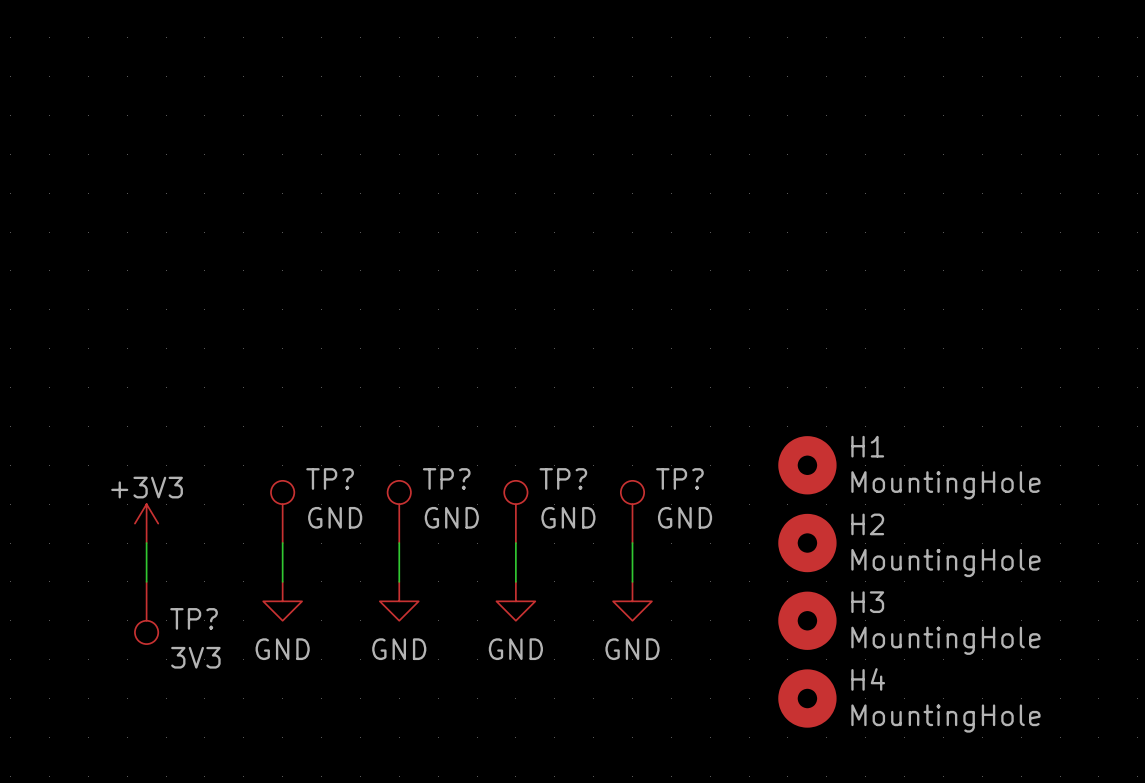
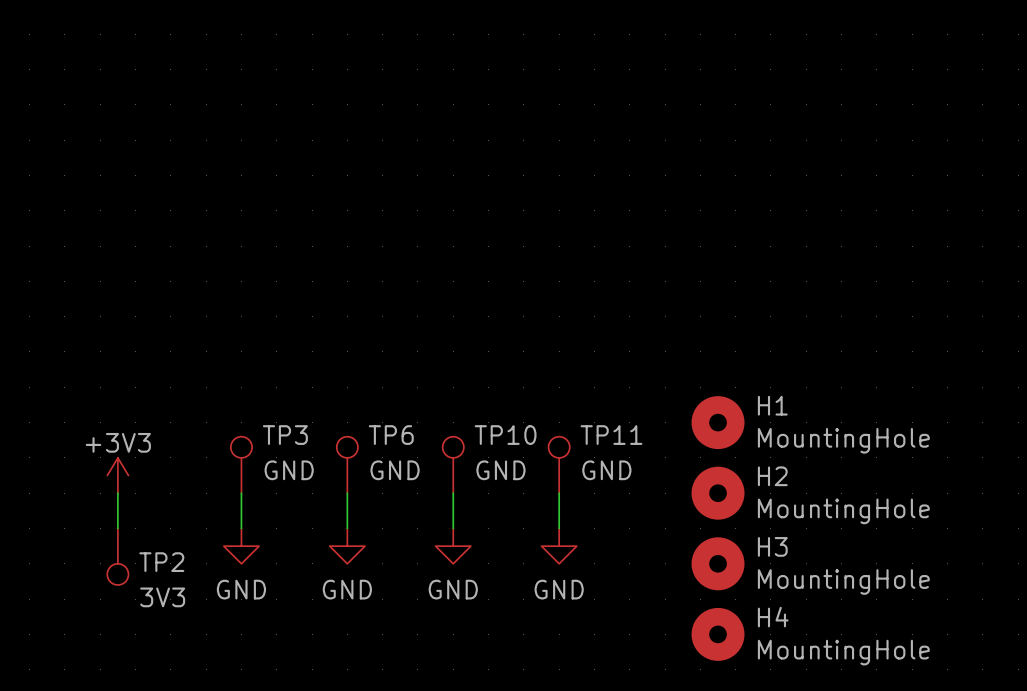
TP? name: TP? (330, 478) -> TP3 (285, 435)
TP? name: TP? (446, 478) -> TP6 (391, 435)
TP? name: TP? (563, 478) -> TP10 (505, 435)
TP? name: TP? (679, 478) -> TP11 (611, 435)
TP? name: TP? (194, 618) -> TP2 (161, 562)

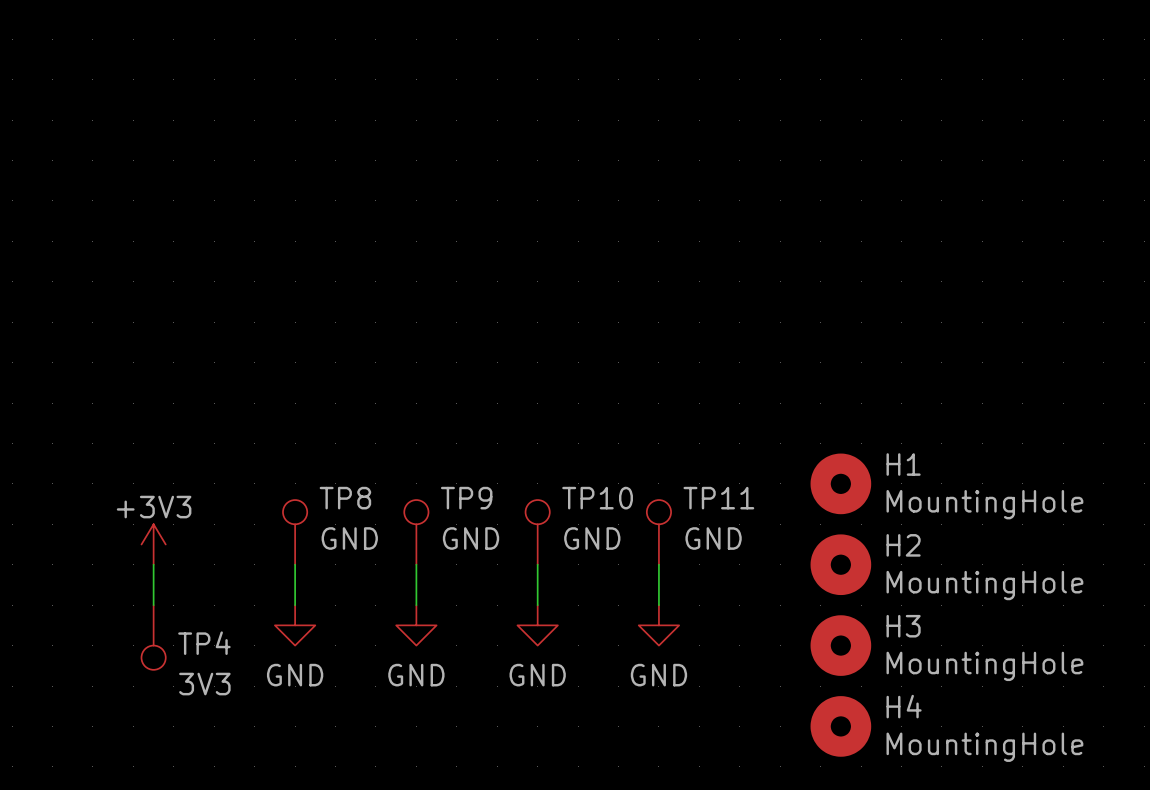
TP3 name: TP3 (285, 435) -> TP8 (345, 498)
TP6 name: TP6 (391, 435) -> TP9 (466, 498)
TP2 name: TP2 (161, 562) -> TP4 (204, 643)

